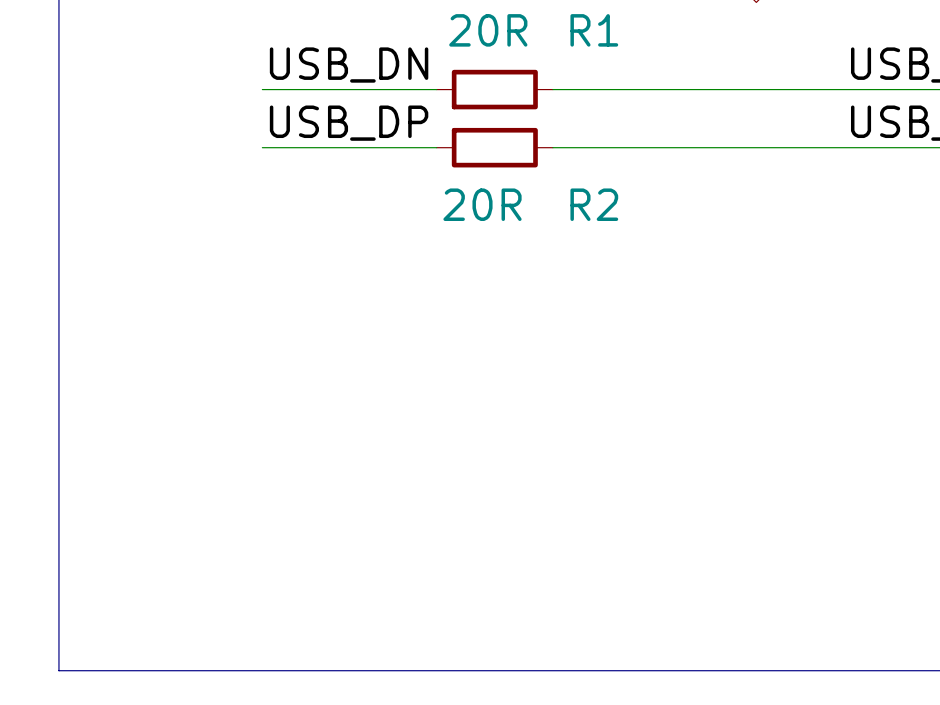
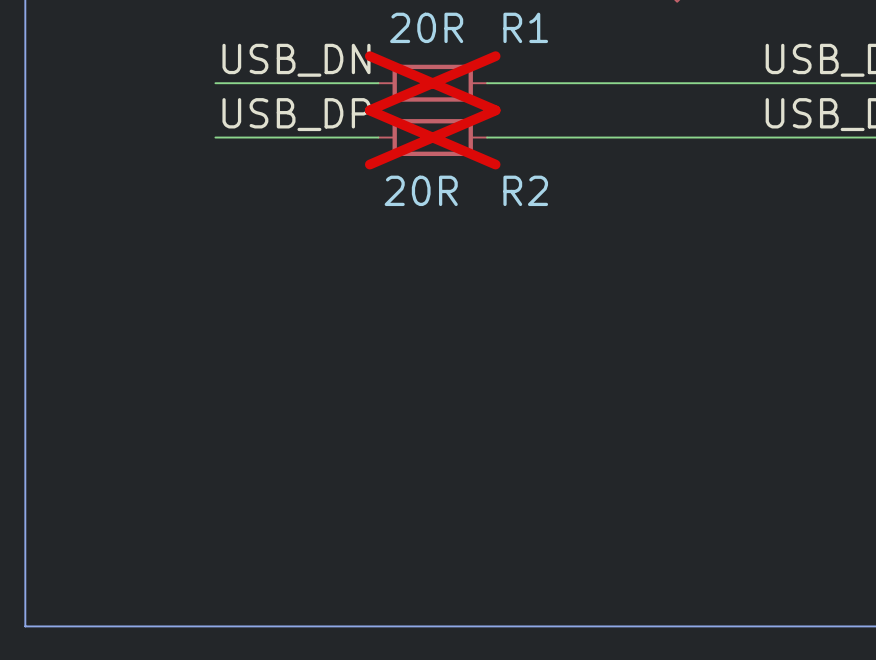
R1 do-not-place cross: none -> (432, 83)
R2 do-not-place cross: none -> (432, 137)

